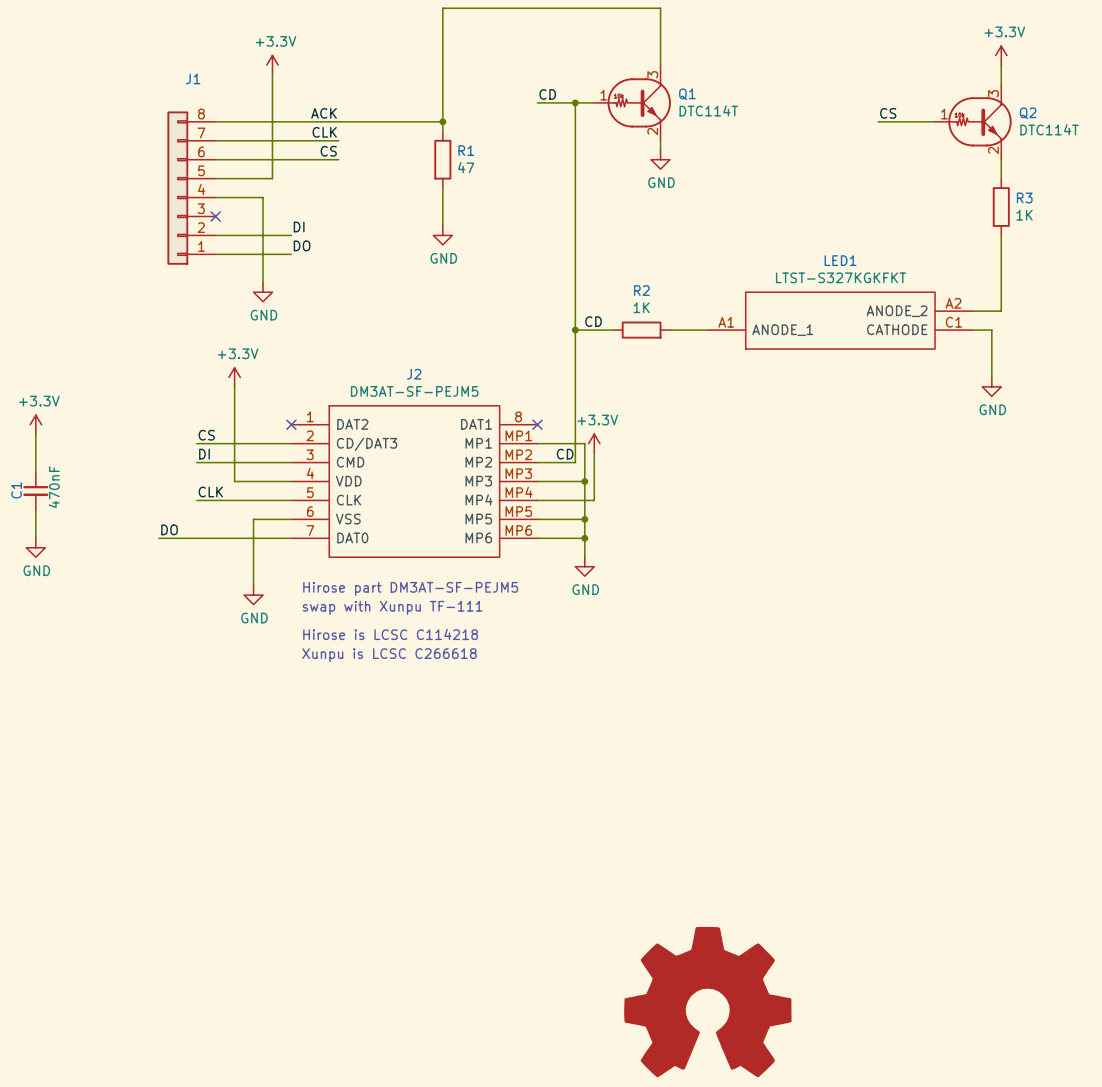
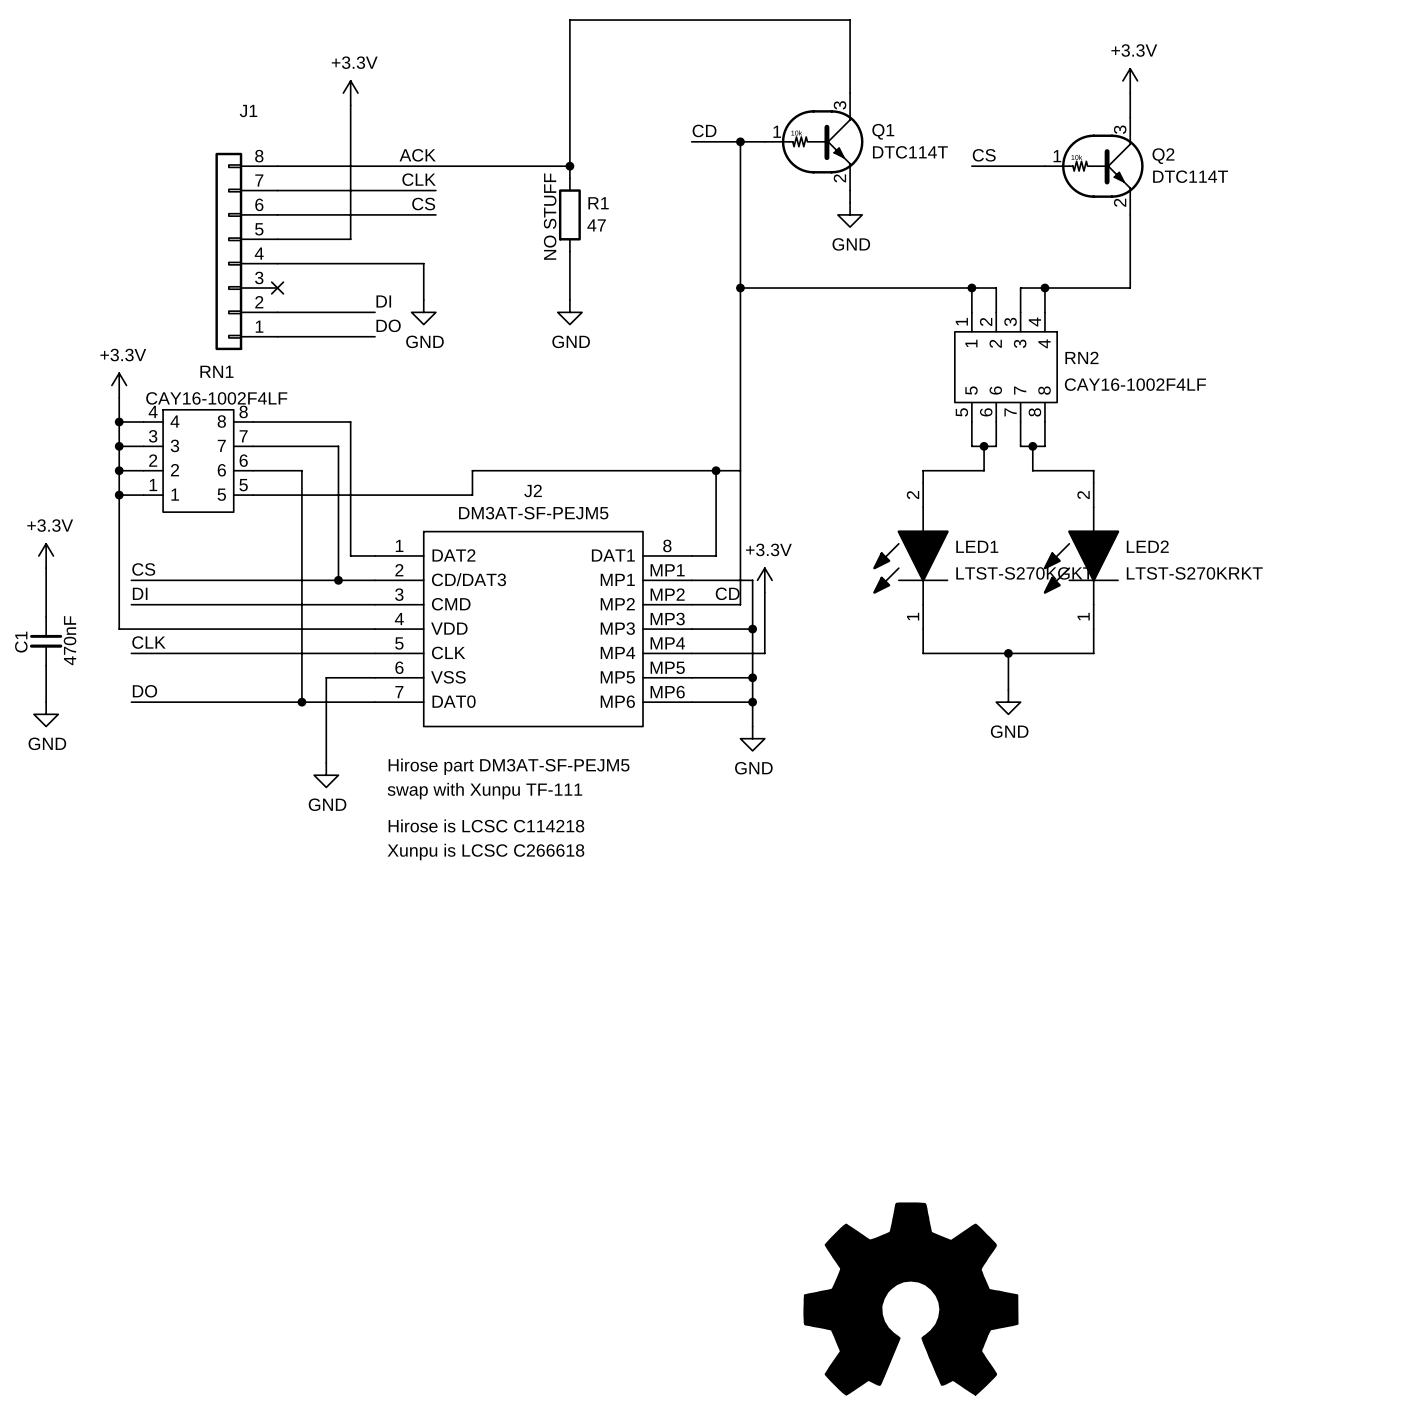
power symbol position: +3.3V (1001, 55) -> +3.3V (1130, 80)
wire: (1001, 65) (1001, 83) -> (1130, 93) (1130, 117)
label position: CS (888, 113) -> CS (984, 155)
wire: (878, 121) (935, 121) -> (971, 166) (1044, 166)
Q2 position: (973, 121) -> (1094, 166)
text: none -> NO STUFF (550, 216)
wire: none -> (1130, 214) (1130, 288) (1020, 288) (1020, 312)
wire: (1001, 159) (1001, 178) -> none
wire: (263, 197) (263, 282) -> (338, 263) (423, 263) (423, 300)
R3: 1K (1001, 207) -> none
wire: none -> (740, 288) (996, 288) (996, 312)
junction: none -> (740, 288)
wire: none -> (971, 288) (971, 312)
junction: none -> (971, 288)
wire: none -> (1044, 288) (1044, 312)
junction: none -> (1044, 288)
wire: (1001, 235) (1001, 311) (972, 311) -> none
LED1 name position: LED1 (840, 260) -> LED1 (977, 546)
LED1 value: LTST-S327KGKFKT (841, 277) -> LTST-S270KGKT (1024, 573)
RN2: none -> CAY16-1002F4LF (1005, 367)
LED1 symbol: [707, 291, 973, 350] -> [873, 482, 949, 630]
power symbol position: GND (263, 292) -> GND (423, 312)
wire: none -> (119, 397) (119, 629) (301, 629) (301, 702)
wire: none -> (119, 421) (143, 421)
junction: none -> (119, 421)
wire: none -> (253, 421) (350, 421) (350, 555) (375, 555)
wire: none -> (971, 421) (971, 446) (996, 446) (996, 421)
wire: none -> (1020, 421) (1020, 446) (1044, 446) (1044, 421)
label: CD (593, 321) -> none
wire: (575, 330) (613, 330) -> none
junction position: (575, 330) -> (716, 470)
R2: 1K (641, 330) -> none
wire: (670, 330) (707, 330) -> none
wire: (972, 330) (991, 330) (991, 377) -> none
wire: none -> (119, 446) (143, 446)
junction: none -> (119, 446)
wire: none -> (253, 446) (338, 446) (338, 580)
wire: none -> (984, 446) (984, 470) (923, 470) (923, 482)
junction: none -> (984, 446)
wire: none -> (1032, 446) (1032, 470) (1093, 470) (1093, 482)
junction: none -> (1032, 446)
RN1: none -> CAY16-1002F4LF (198, 460)
wire: none -> (119, 470) (143, 470)
junction: none -> (119, 470)
wire: none -> (253, 470) (301, 470) (301, 507)
wire: none -> (716, 470) (716, 555) (691, 555)
wire: none -> (740, 470) (472, 470) (472, 495) (253, 495)
wire: none -> (119, 495) (143, 495)
junction: none -> (119, 495)
power symbol position: +3.3V (234, 377) -> +3.3V (119, 385)
power symbol: GND (991, 386) -> none
no-connect mark: (291, 424) -> none
no-connect mark: (537, 424) -> none
LED2: none -> LTST-S270KRKT (1081, 555)
label position: CS (206, 435) -> CS (143, 569)
wire: none -> (131, 580) (253, 580)
junction: none -> (338, 580)
label position: DI (204, 454) -> DI (140, 593)
wire: none -> (131, 604) (253, 604)
wire: none -> (923, 629) (923, 653) (1093, 653) (1093, 629)
label position: CLK (210, 492) -> CLK (148, 642)
wire: none -> (131, 653) (253, 653)
wire: none -> (1008, 653) (1008, 689)
junction: none -> (1008, 653)
label position: DO (169, 529) -> DO (144, 691)
wire: none -> (131, 702) (204, 702)
junction: none -> (301, 702)
power symbol: none -> GND (1008, 702)

